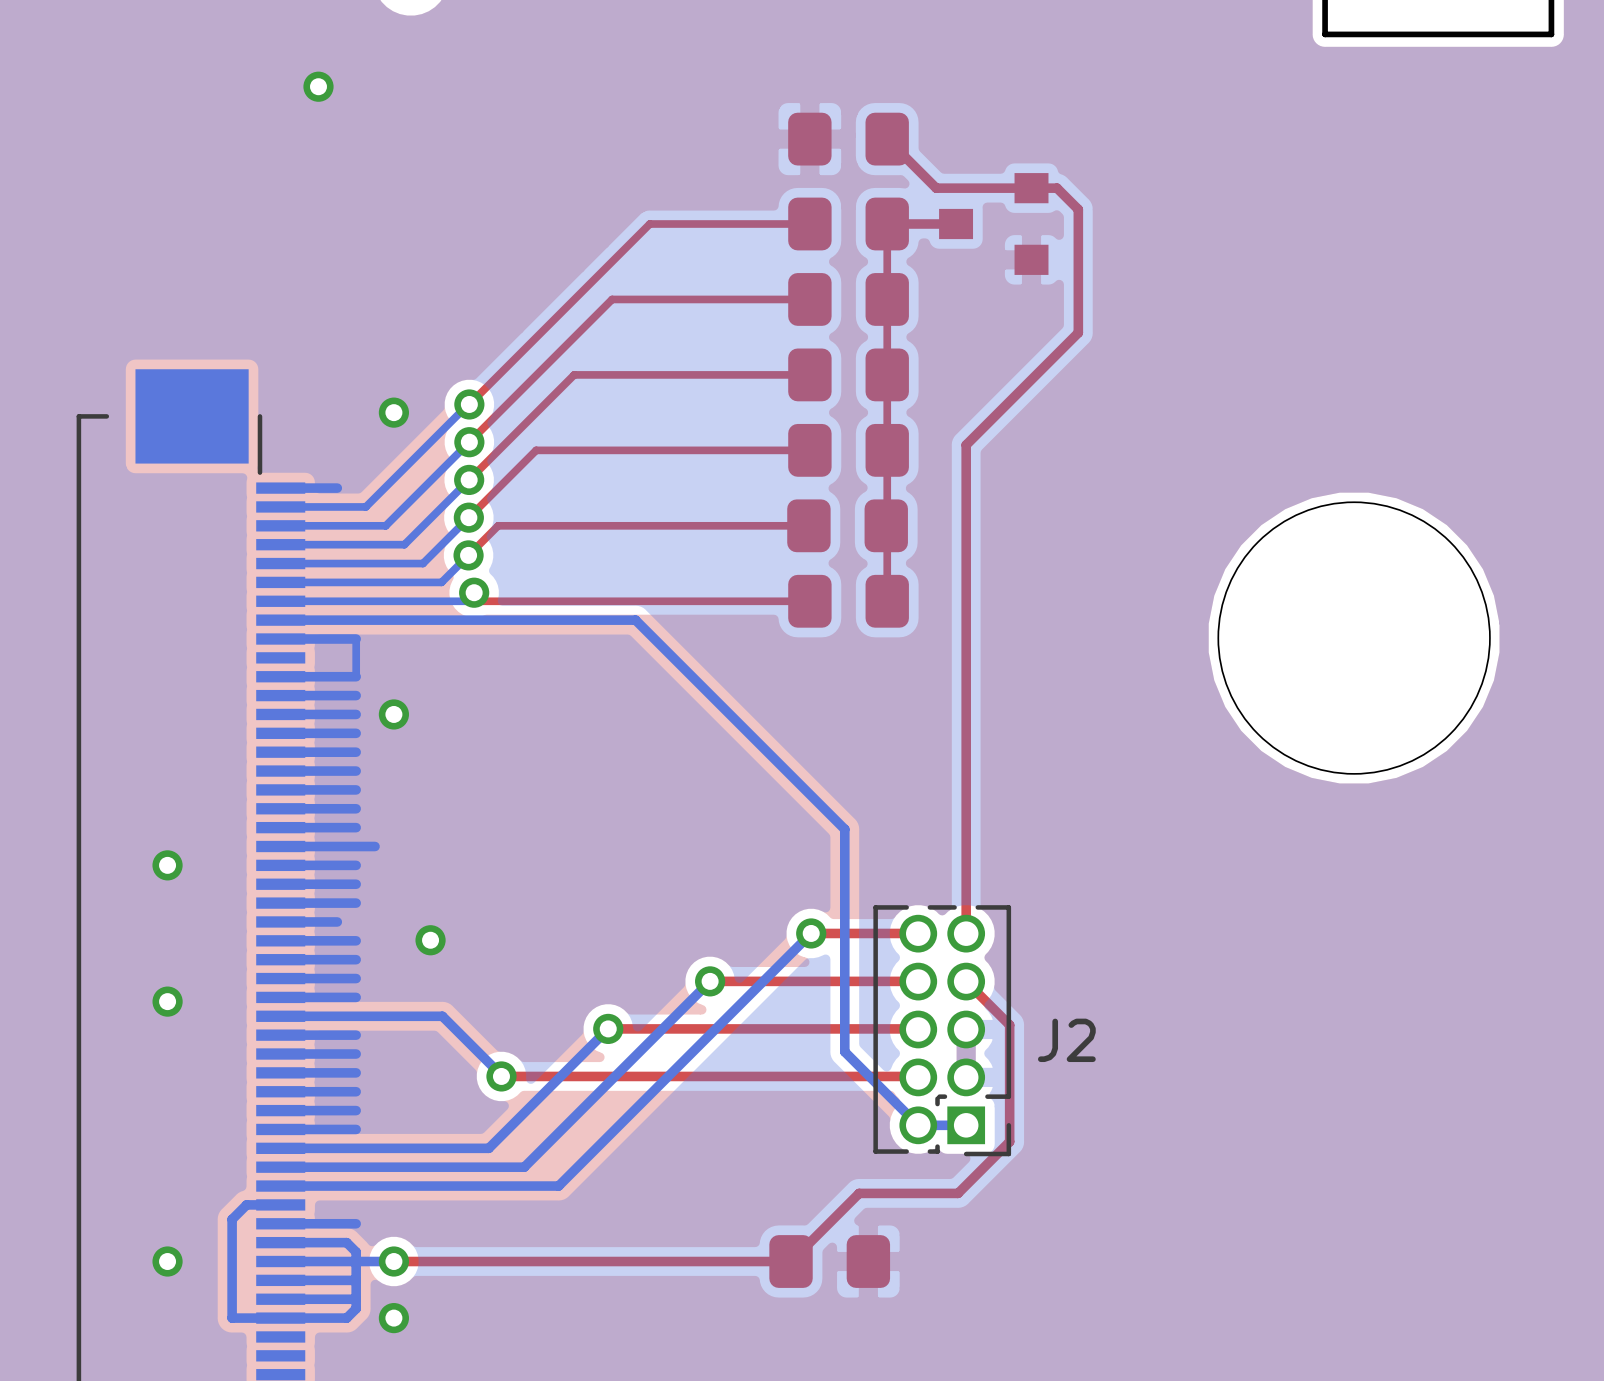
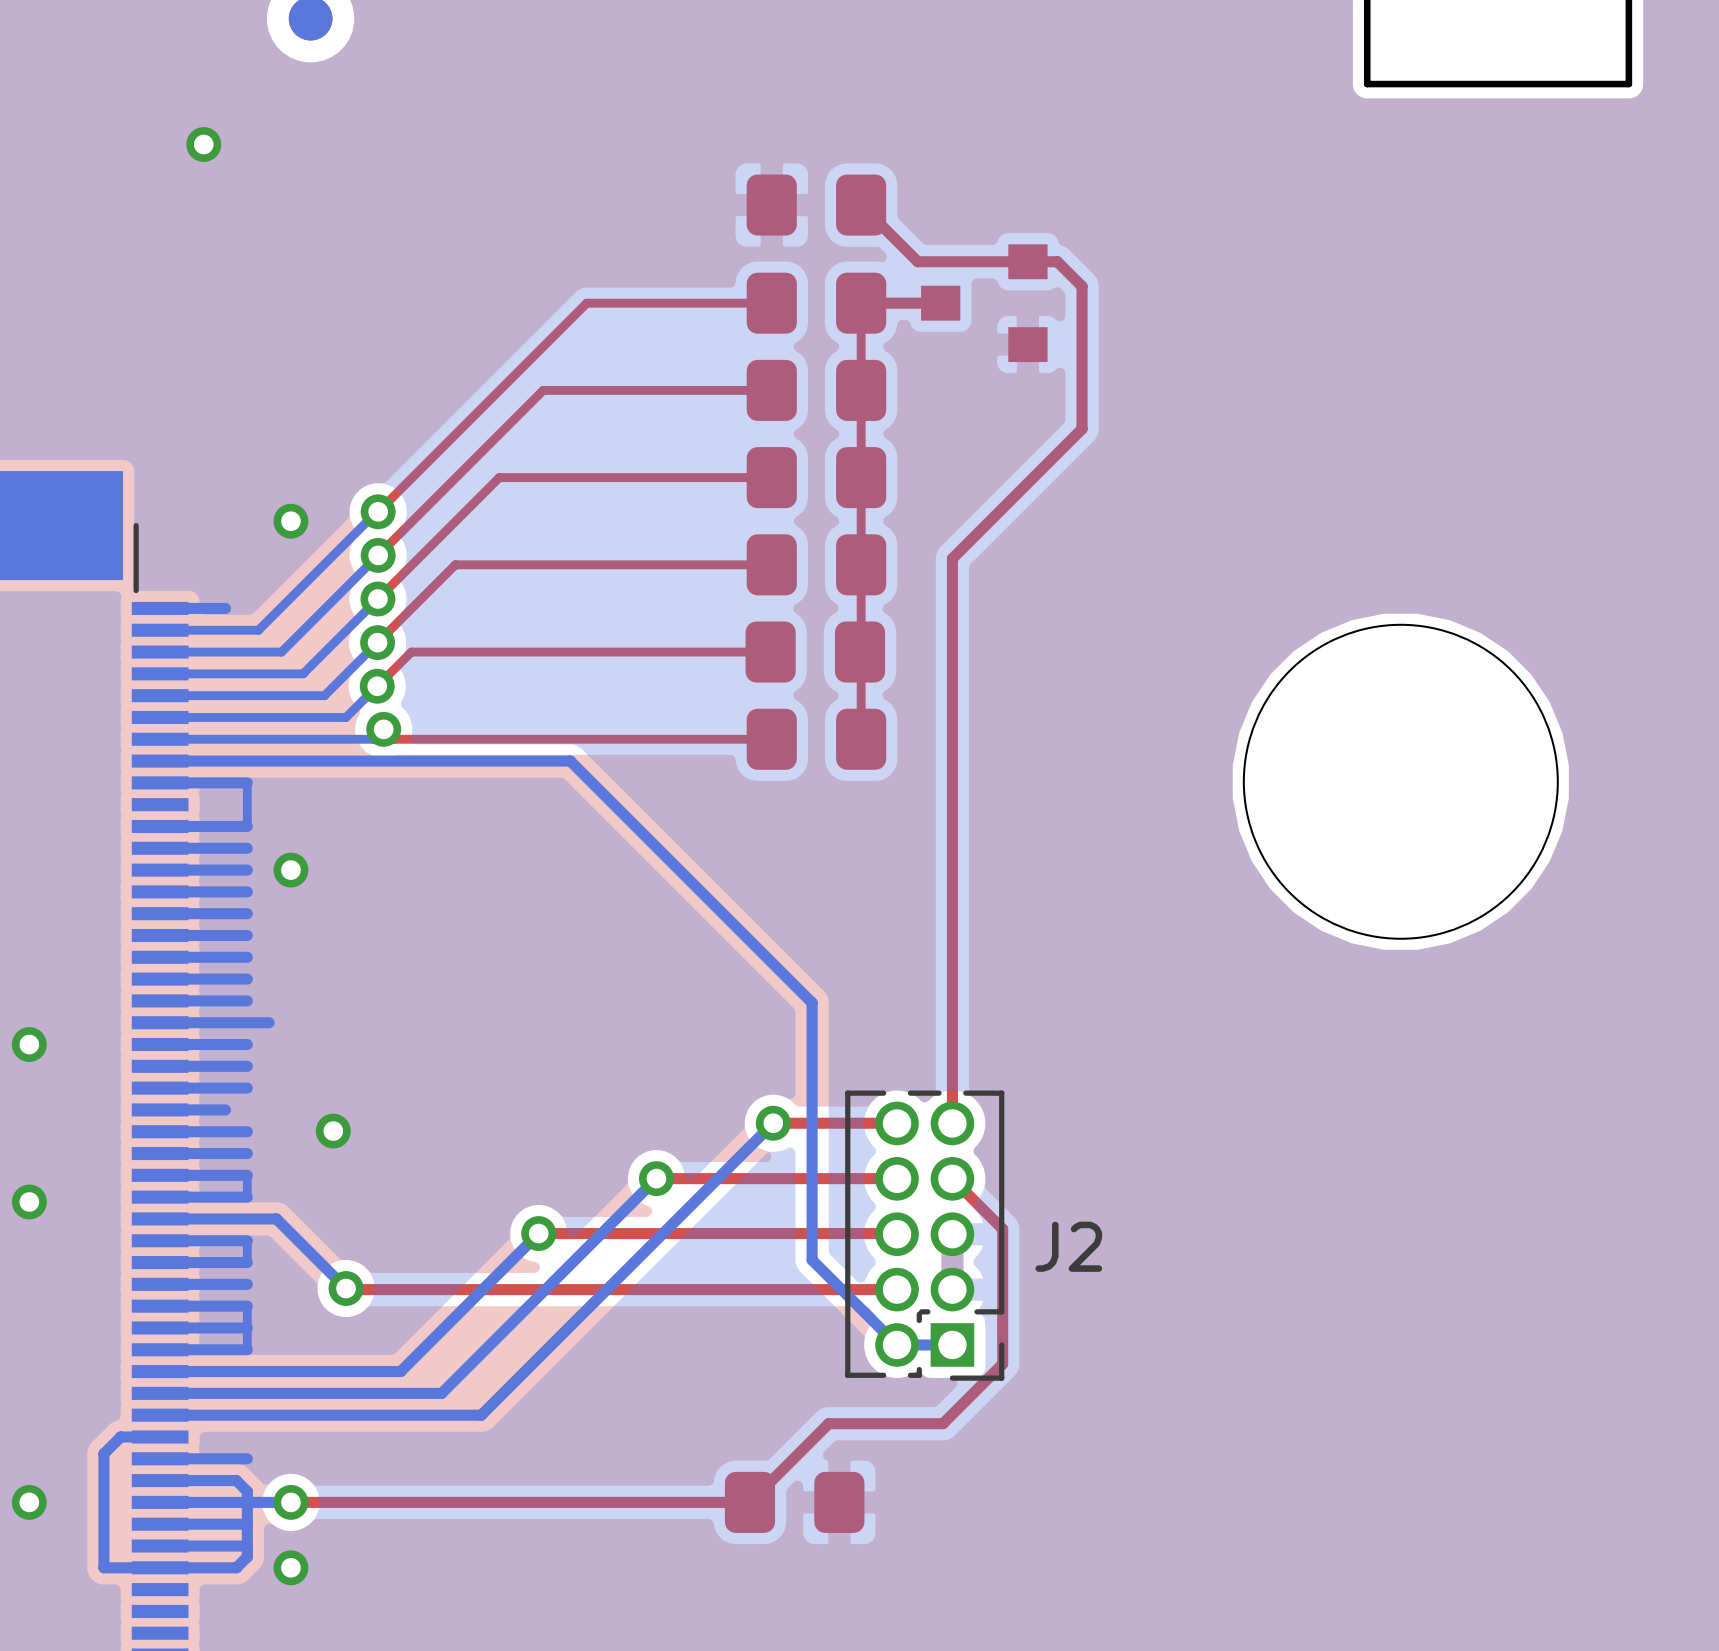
bottom track: none -> (247, 1175) (247, 1197)
bottom track: (381, 1016) (442, 1016) (501, 1076) -> (276, 1218) (346, 1288)
bottom track: none -> (247, 1240) (247, 1262)
top track: (501, 1076) (918, 1077) -> (346, 1288) (897, 1289)
via position: (501, 1076) -> (346, 1288)
bottom track: none -> (247, 1306) (247, 1349)

